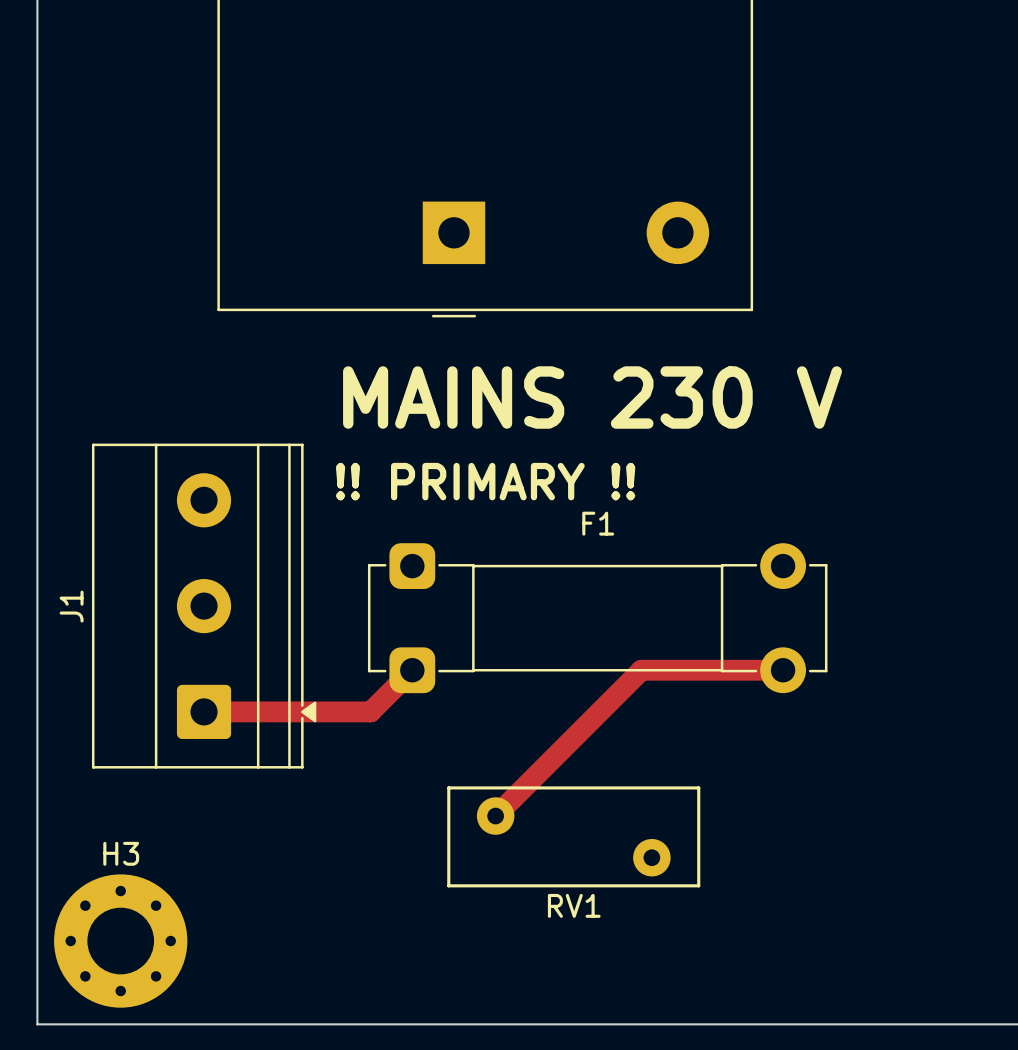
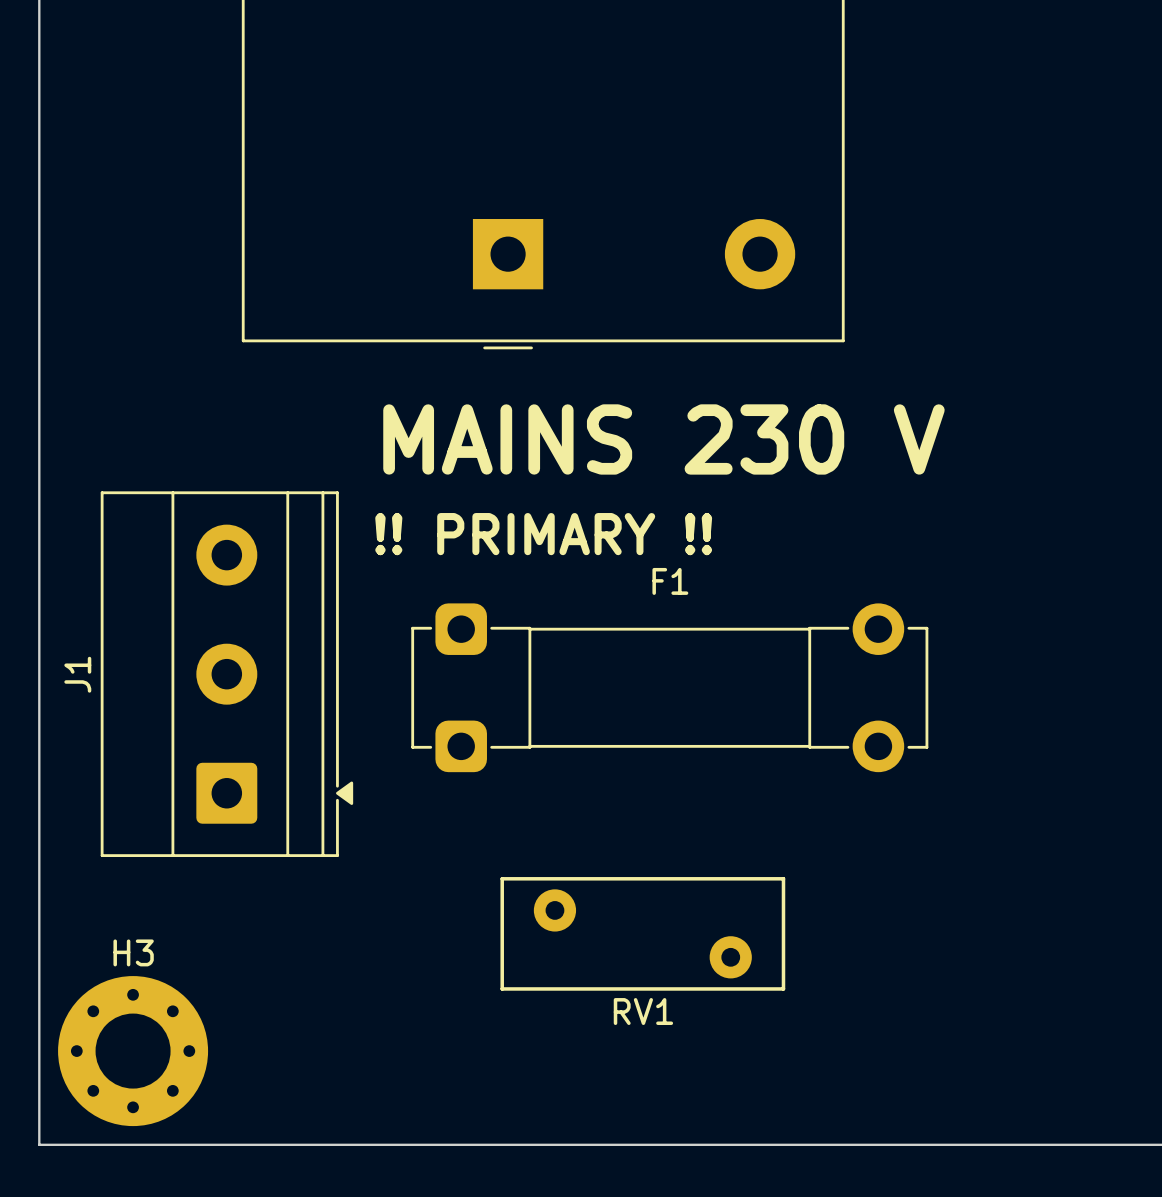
track: (412, 670) (370, 711) (204, 711) -> none
track: (783, 670) (641, 670) (495, 816) -> none

